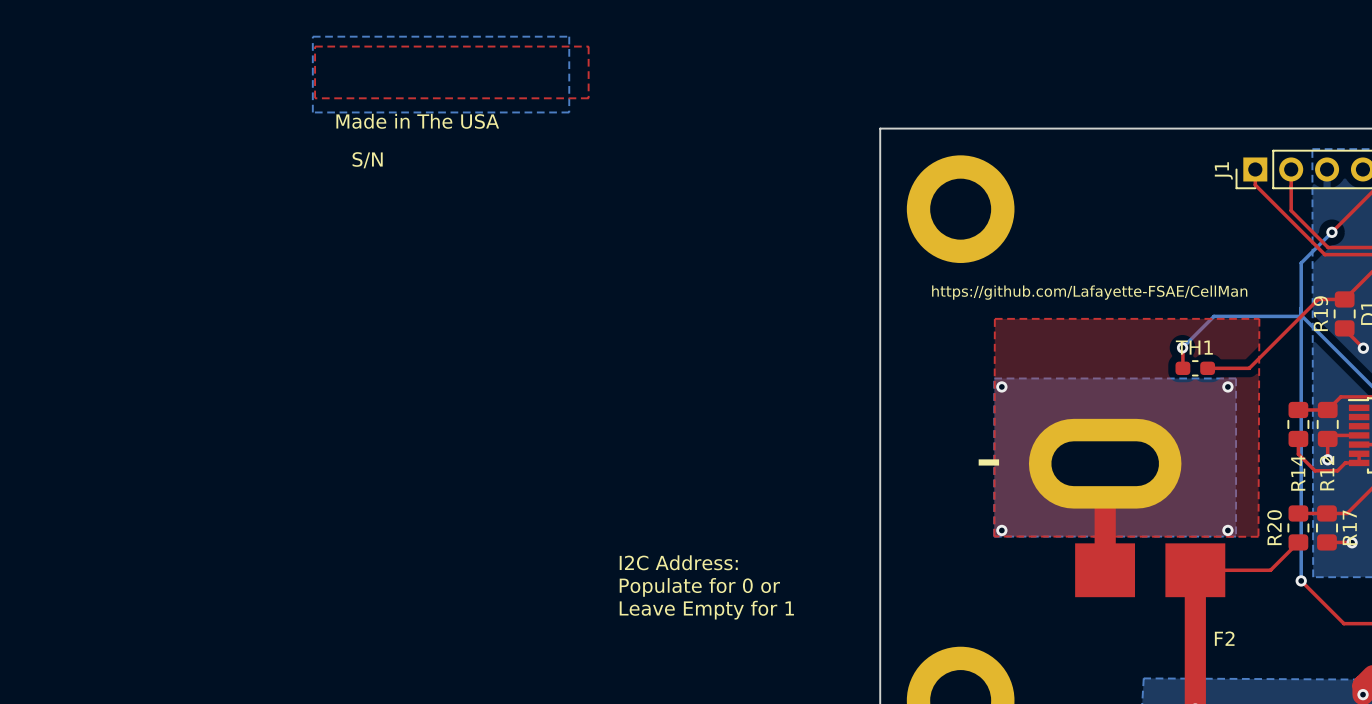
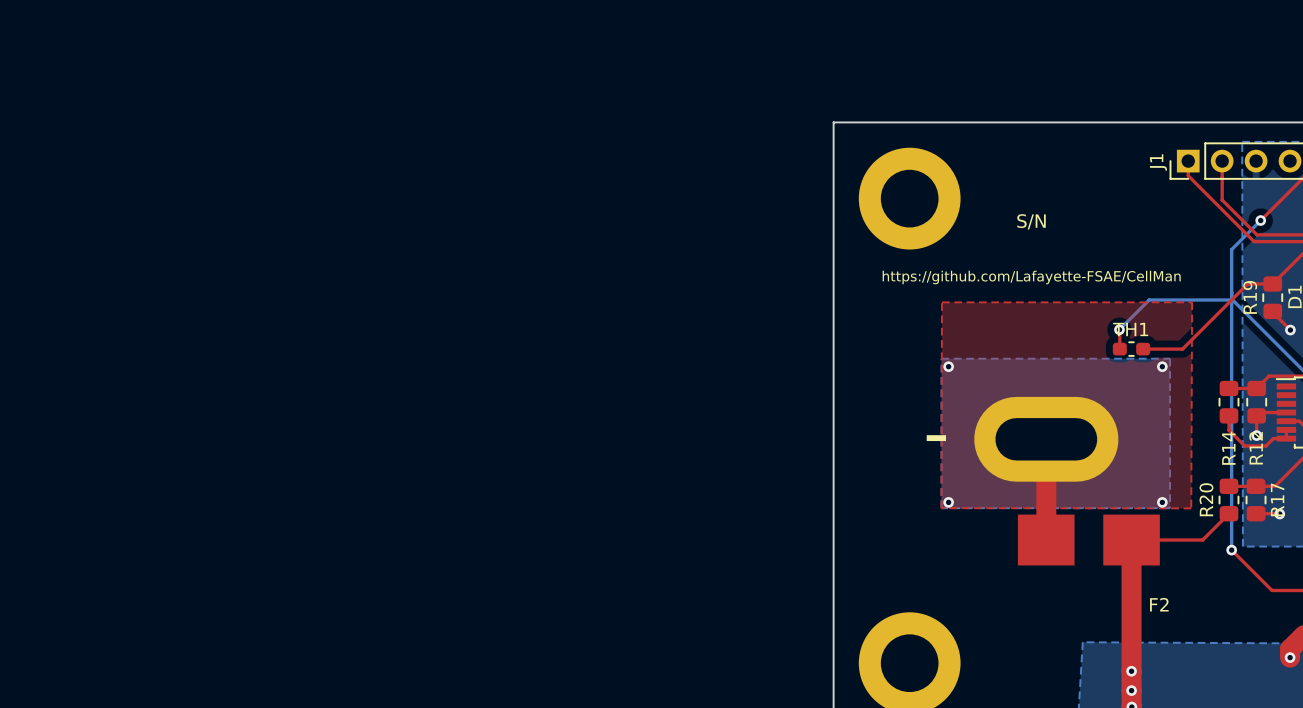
bottom zone outline: (312, 36) (312, 112) (569, 112) (569, 36) (312, 36) -> none
top zone outline: (315, 46) (588, 46) (588, 98) (315, 98) (315, 46) -> none
text: Made in The USA (417, 121) -> none
text: S/N (367, 160) -> none
text: none -> S/N (1031, 221)
text: I2C Address: (678, 562) -> none
text: Populate for 0 or (699, 587) -> none
text: Leave Empty for 1 (706, 610) -> none

